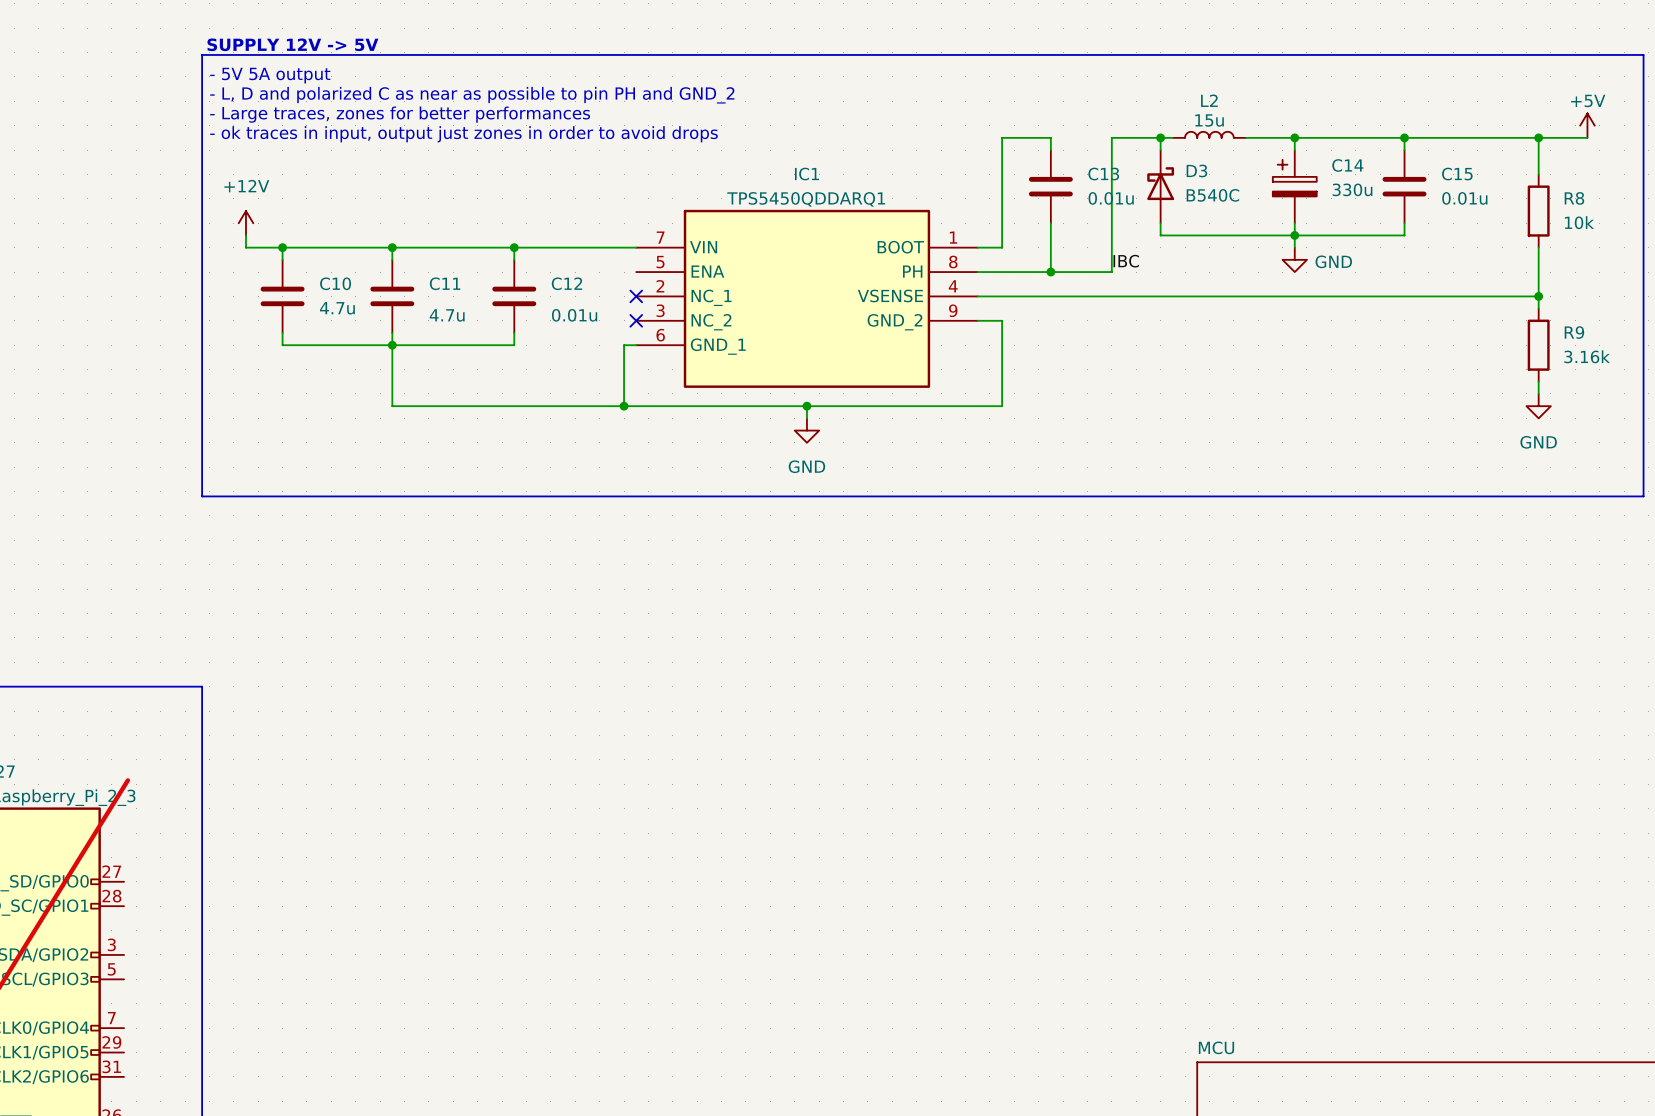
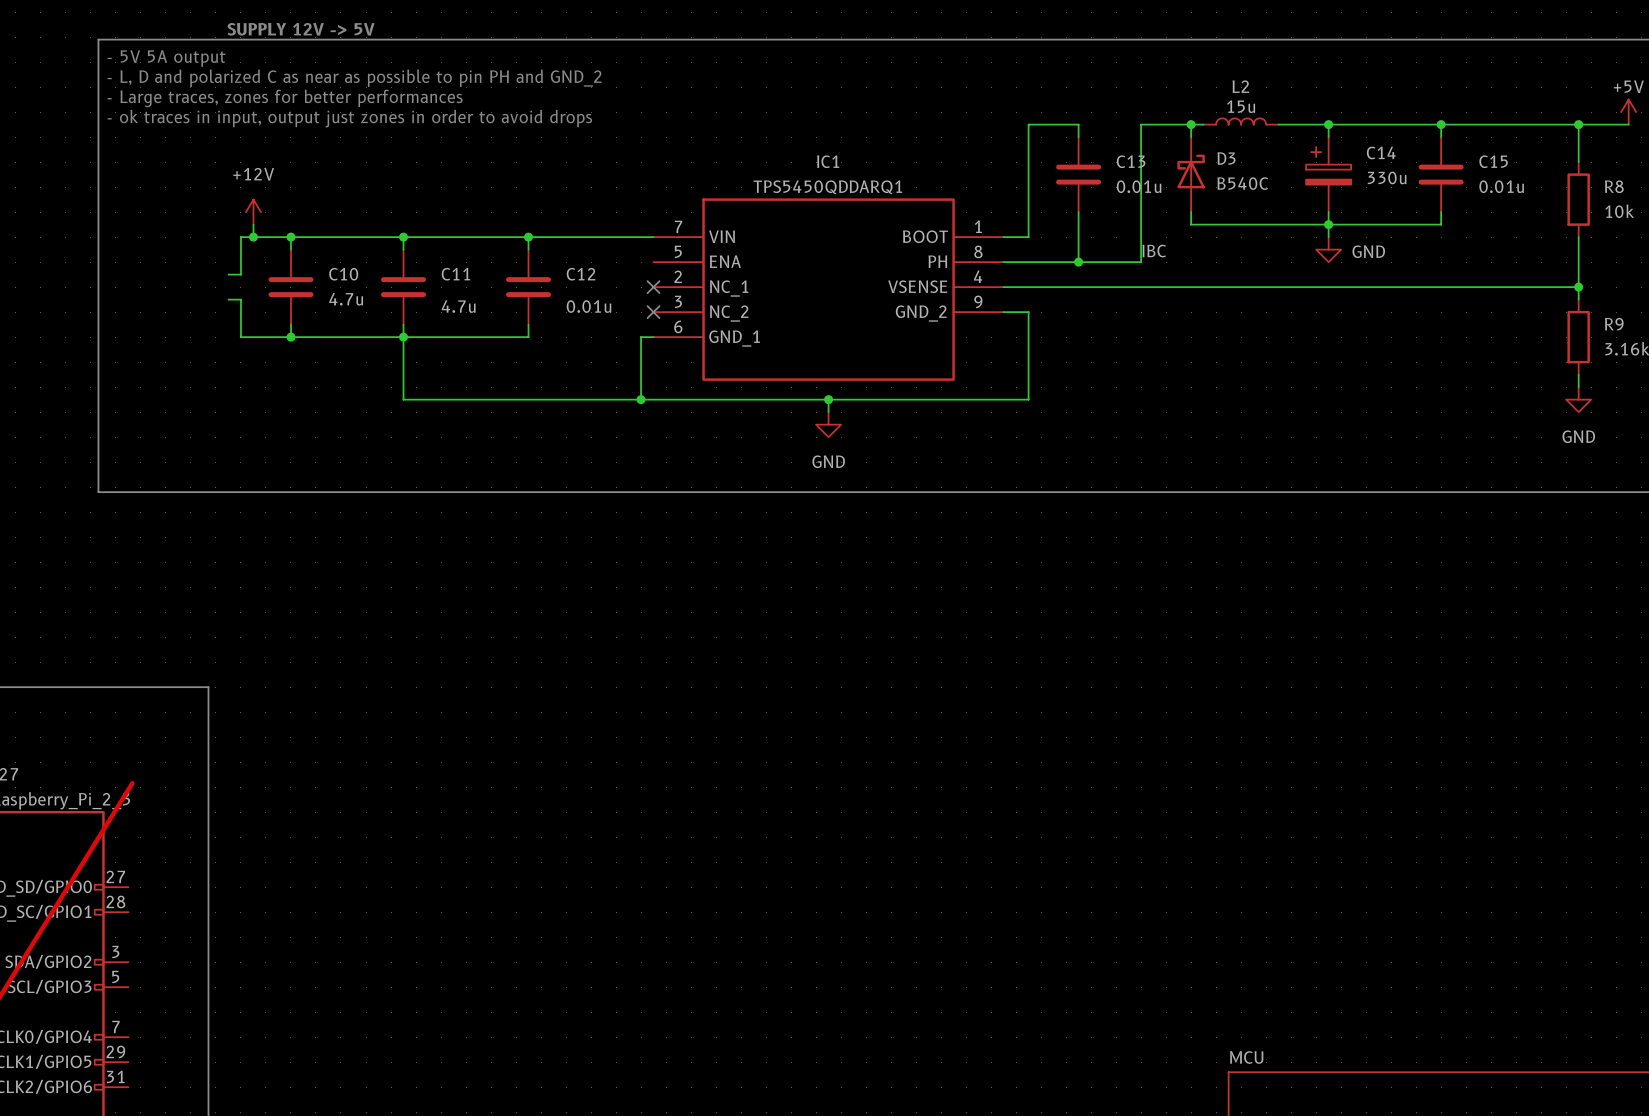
line: (202, 54) (202, 496) -> (208, 39) (98, 39) (98, 492) (208, 492)
text position: - 5V 5A output (270, 75) -> - 5V 5A output (166, 58)
text position: - L, D and polarized C as near as possible to pin PH and GND_2 (472, 95) -> - L, D and polarized C as near as possible to pin PH and GND_2 (354, 78)
text position: - Large traces, zones for better performances (400, 114) -> - Large traces, zones for better performances (285, 98)
text position: - ok traces in input, output just zones in order to avoid drops (464, 134) -> - ok traces in input, output just zones in order to avoid drops (349, 118)
wire: none -> (253, 237) (240, 237) (240, 274) (228, 274)
junction: none -> (253, 237)
wire: none -> (228, 299) (240, 299) (240, 337) (290, 337)
junction: none -> (290, 337)

